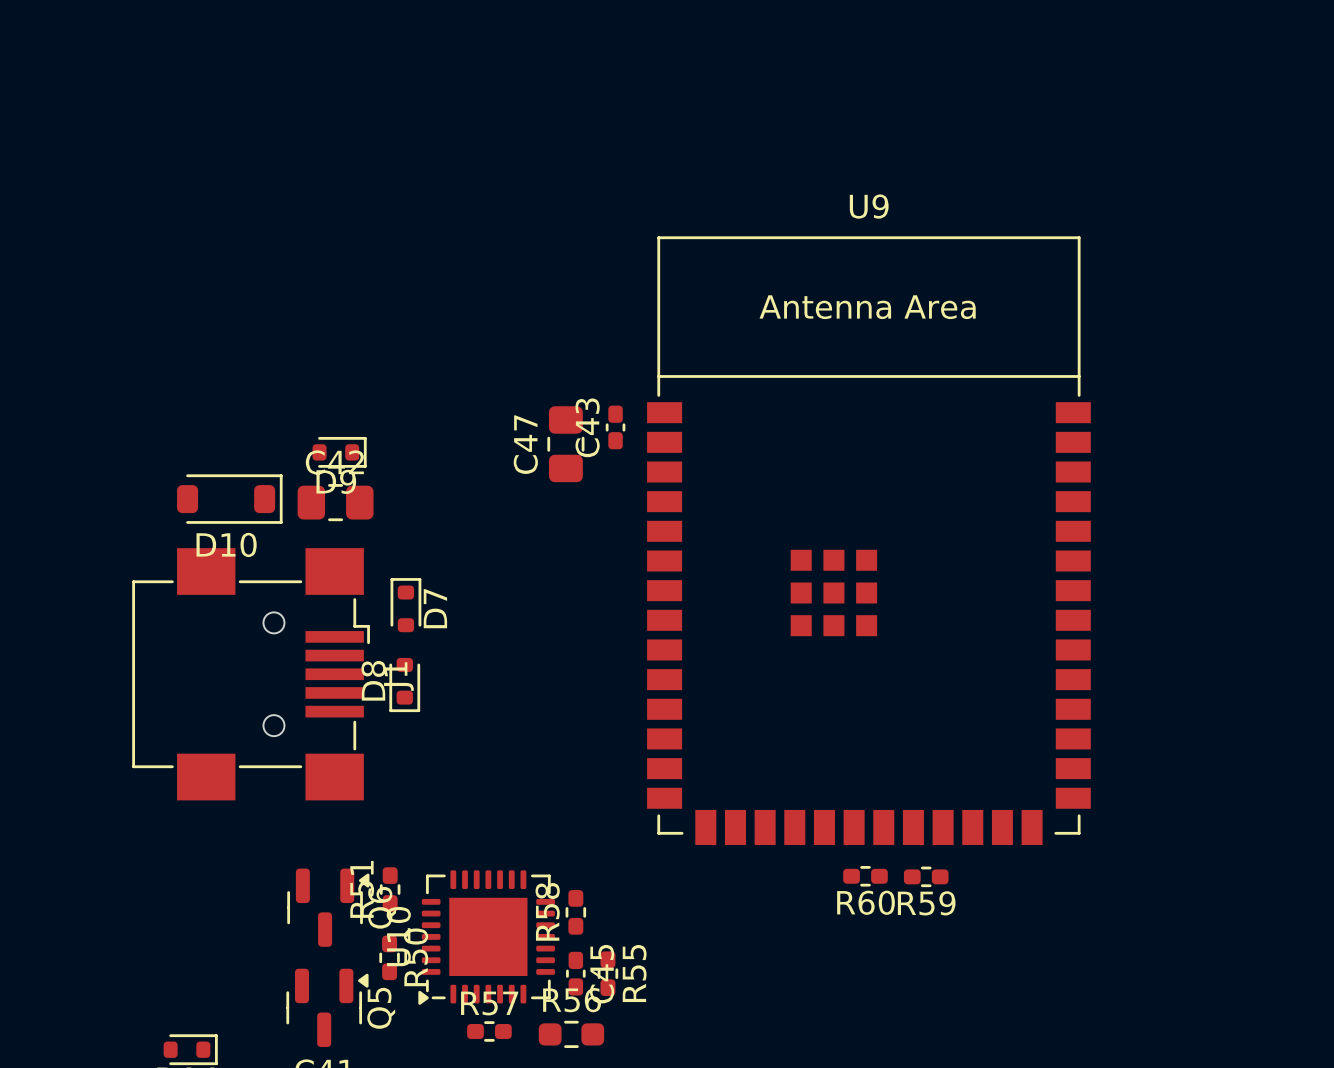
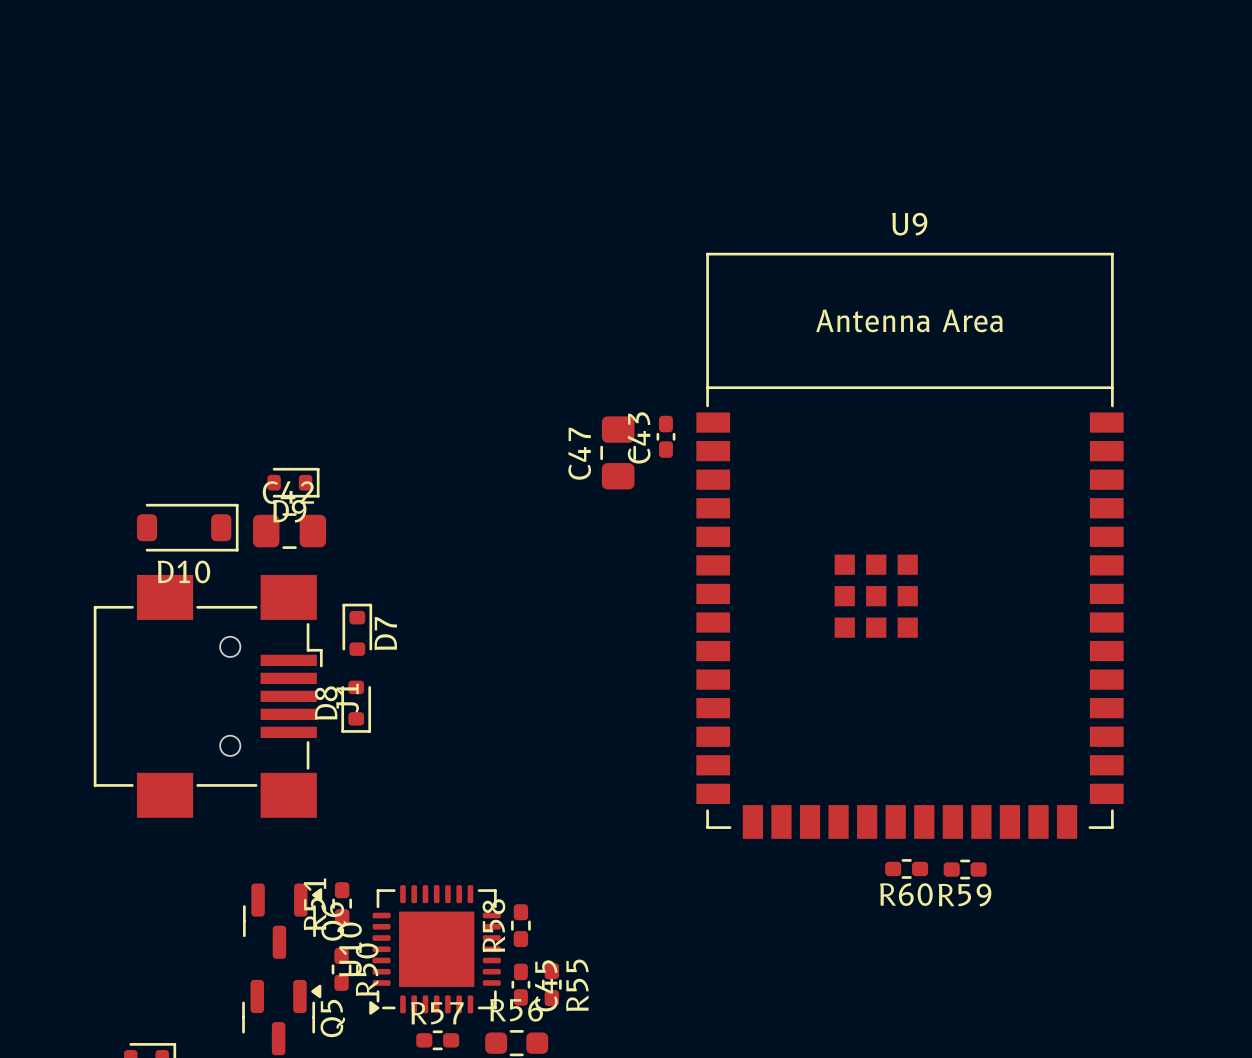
C43 position: (615, 427) -> (665, 436)
C47 position: (565, 444) -> (618, 452)
U9 position: (868, 540) -> (909, 545)
R60 position: (865, 876) -> (906, 868)
R59 position: (926, 876) -> (965, 869)

